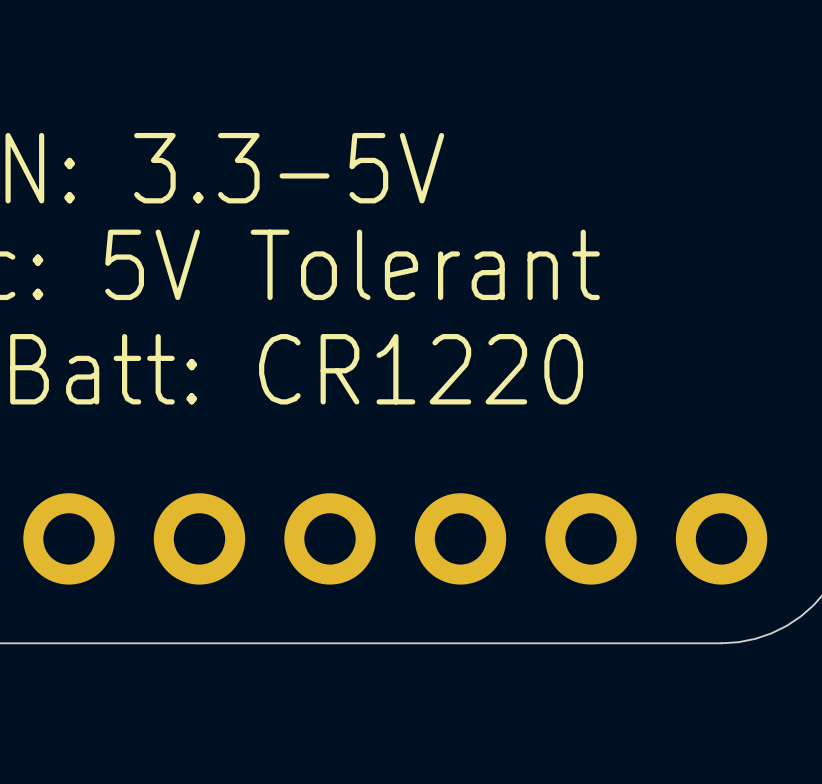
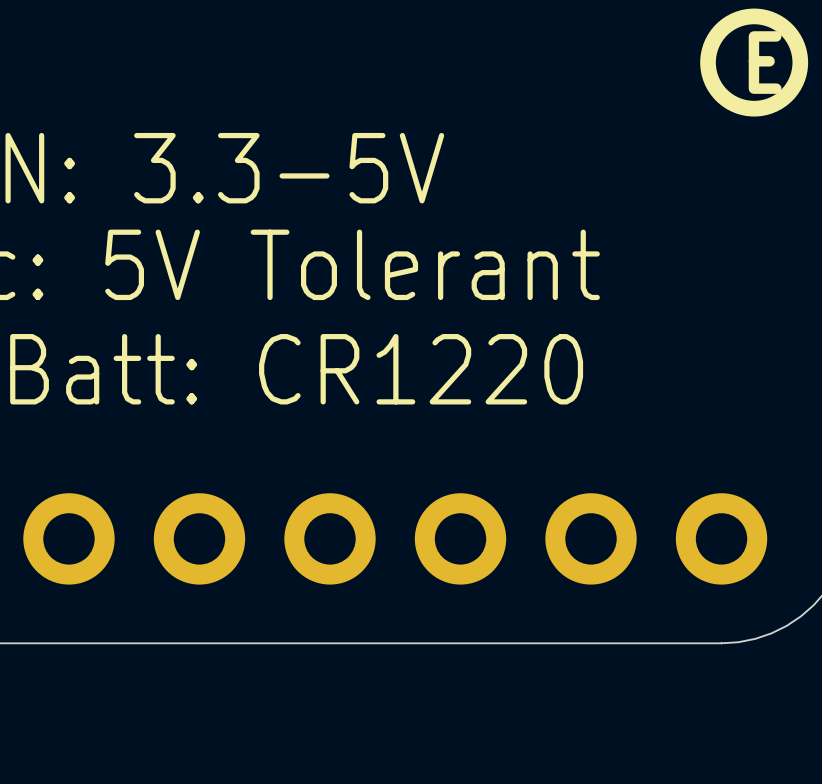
drawing: none -> [700, 8, 809, 117]

